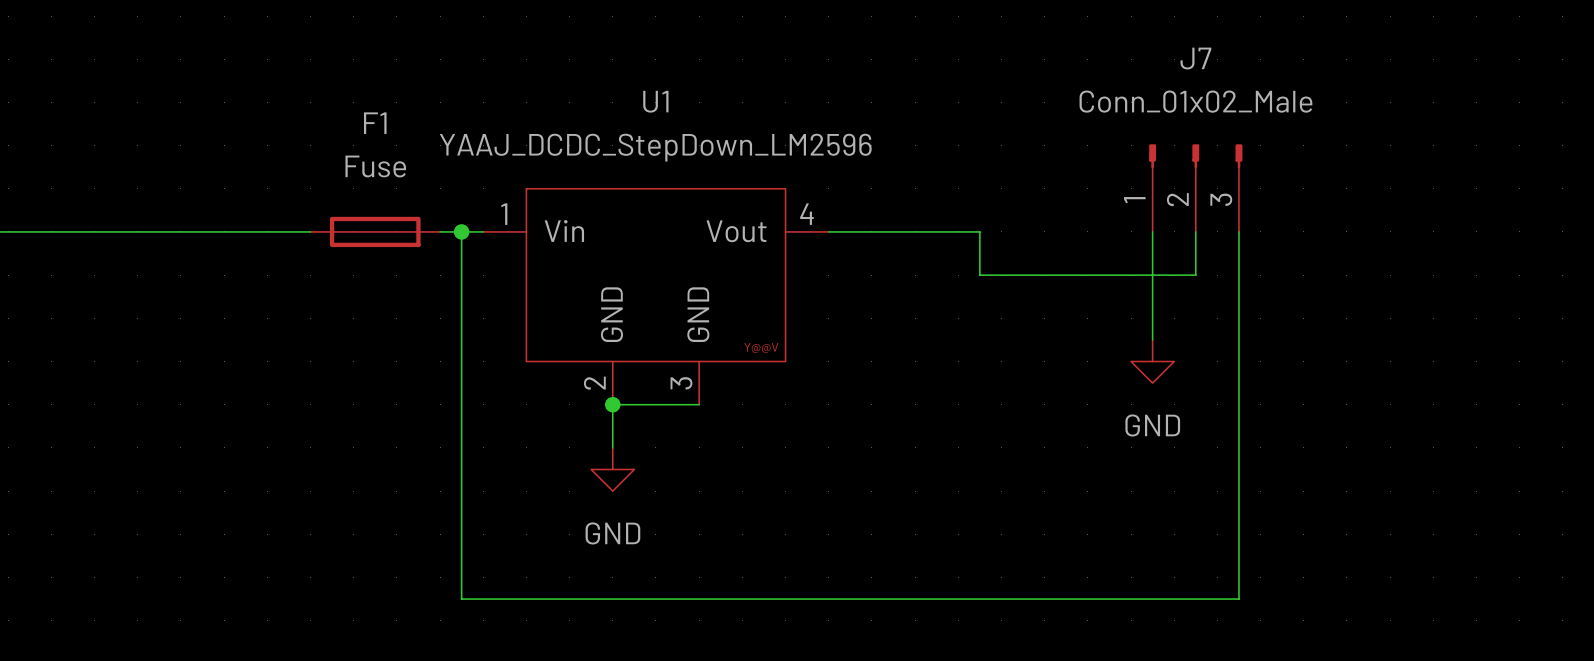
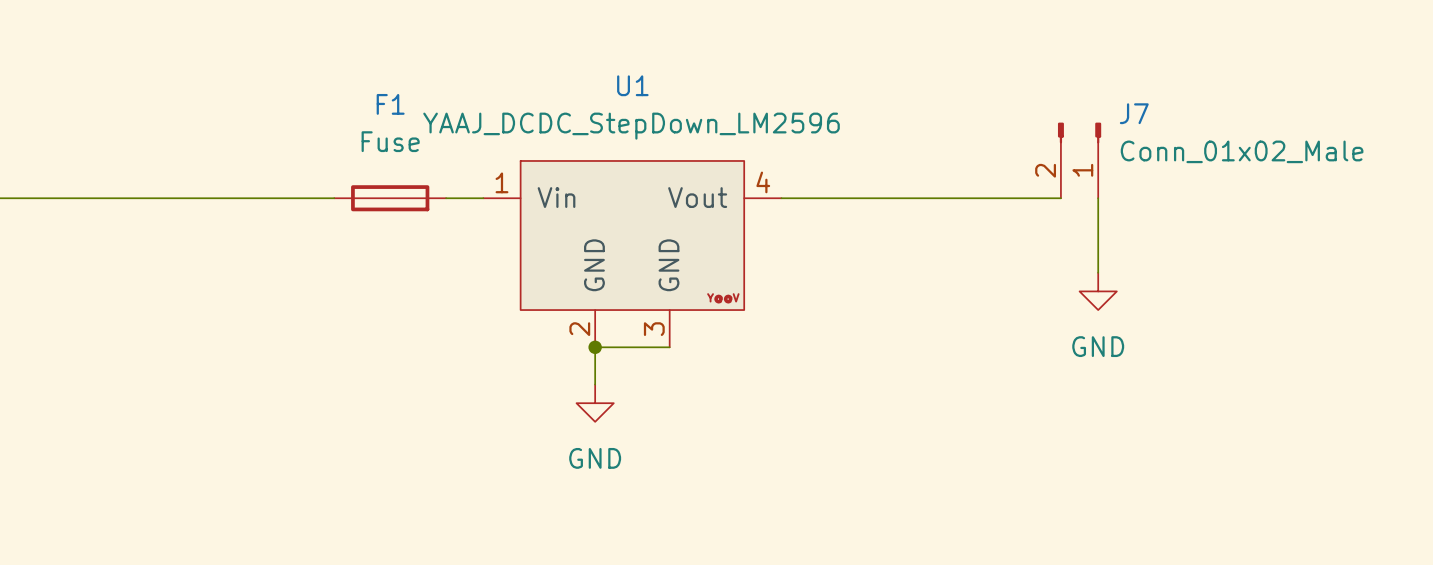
J7 name position: J7 (1195, 58) -> J7 (1134, 113)
J7 value position: Conn_01x02_Male (1195, 101) -> Conn_01x02_Male (1242, 151)
J7 symbol: [1149, 144, 1243, 232] -> [1057, 122, 1102, 199]
wire: (461, 231) (461, 599) (1238, 599) (1238, 231) -> none
junction: (461, 231) -> none
wire: (979, 231) (979, 275) (1195, 275) -> (911, 198) (1060, 198)
wire: (1152, 231) (1152, 339) -> none
wire: none -> (1098, 235) (1098, 272)
power symbol position: GND (1152, 361) -> GND (1098, 291)

